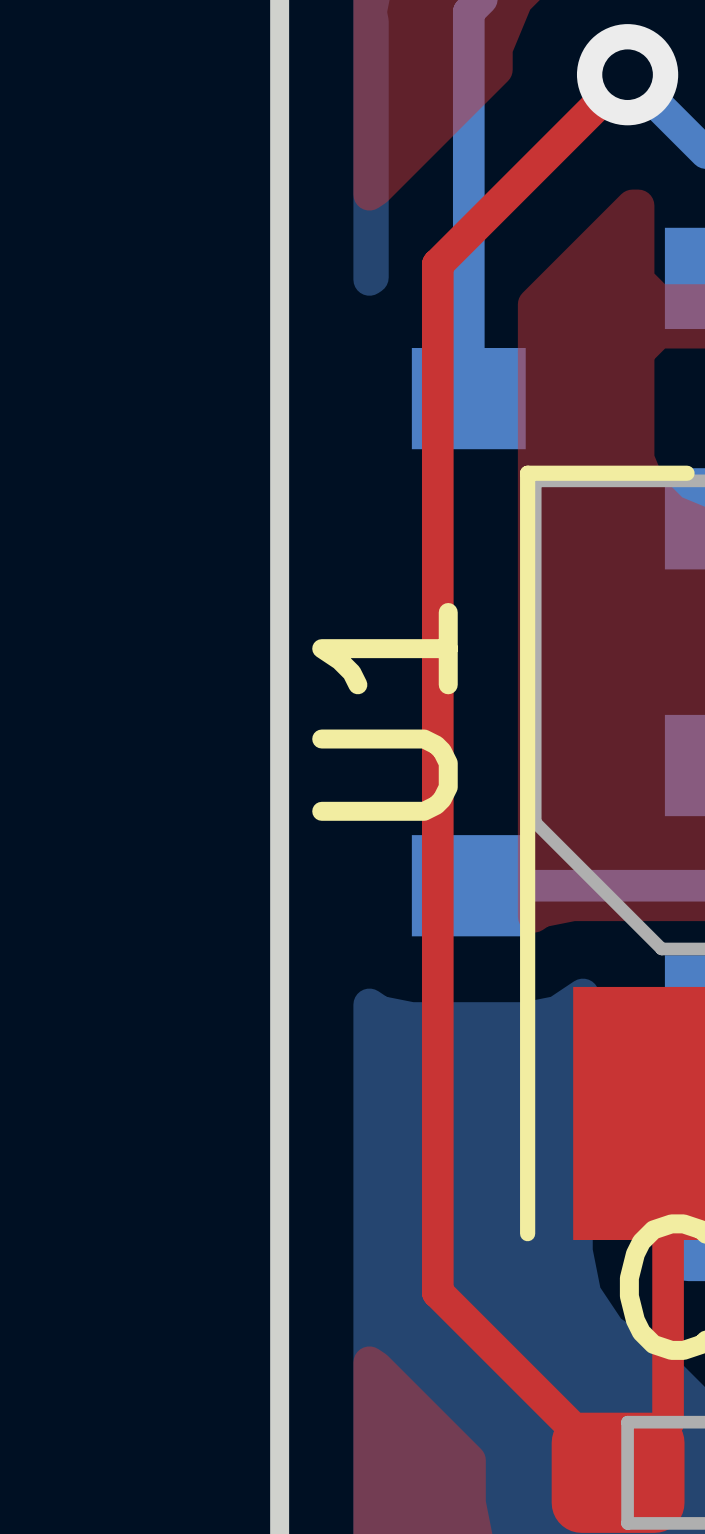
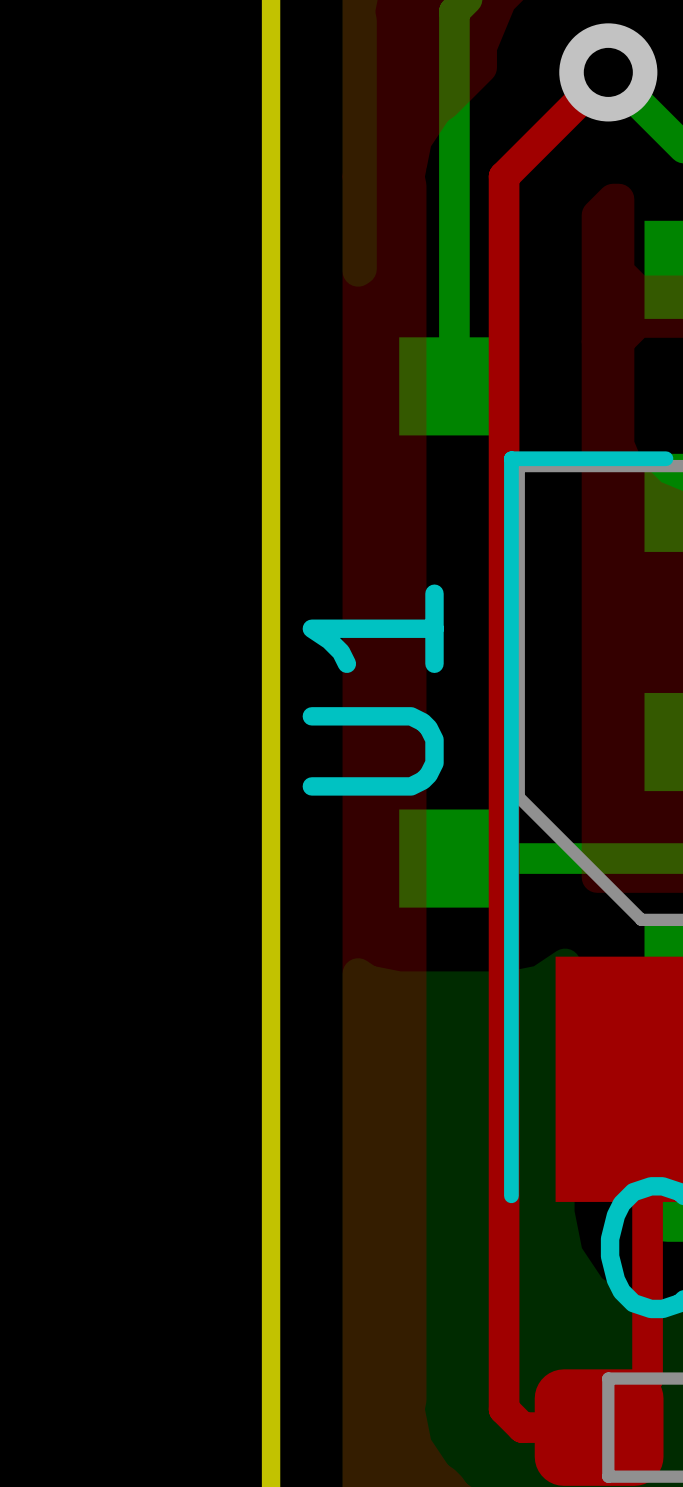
top track: (520, 182) (437, 264) (437, 1292) (618, 1472) -> (504, 176) (504, 1409) (522, 1427) (599, 1427)

